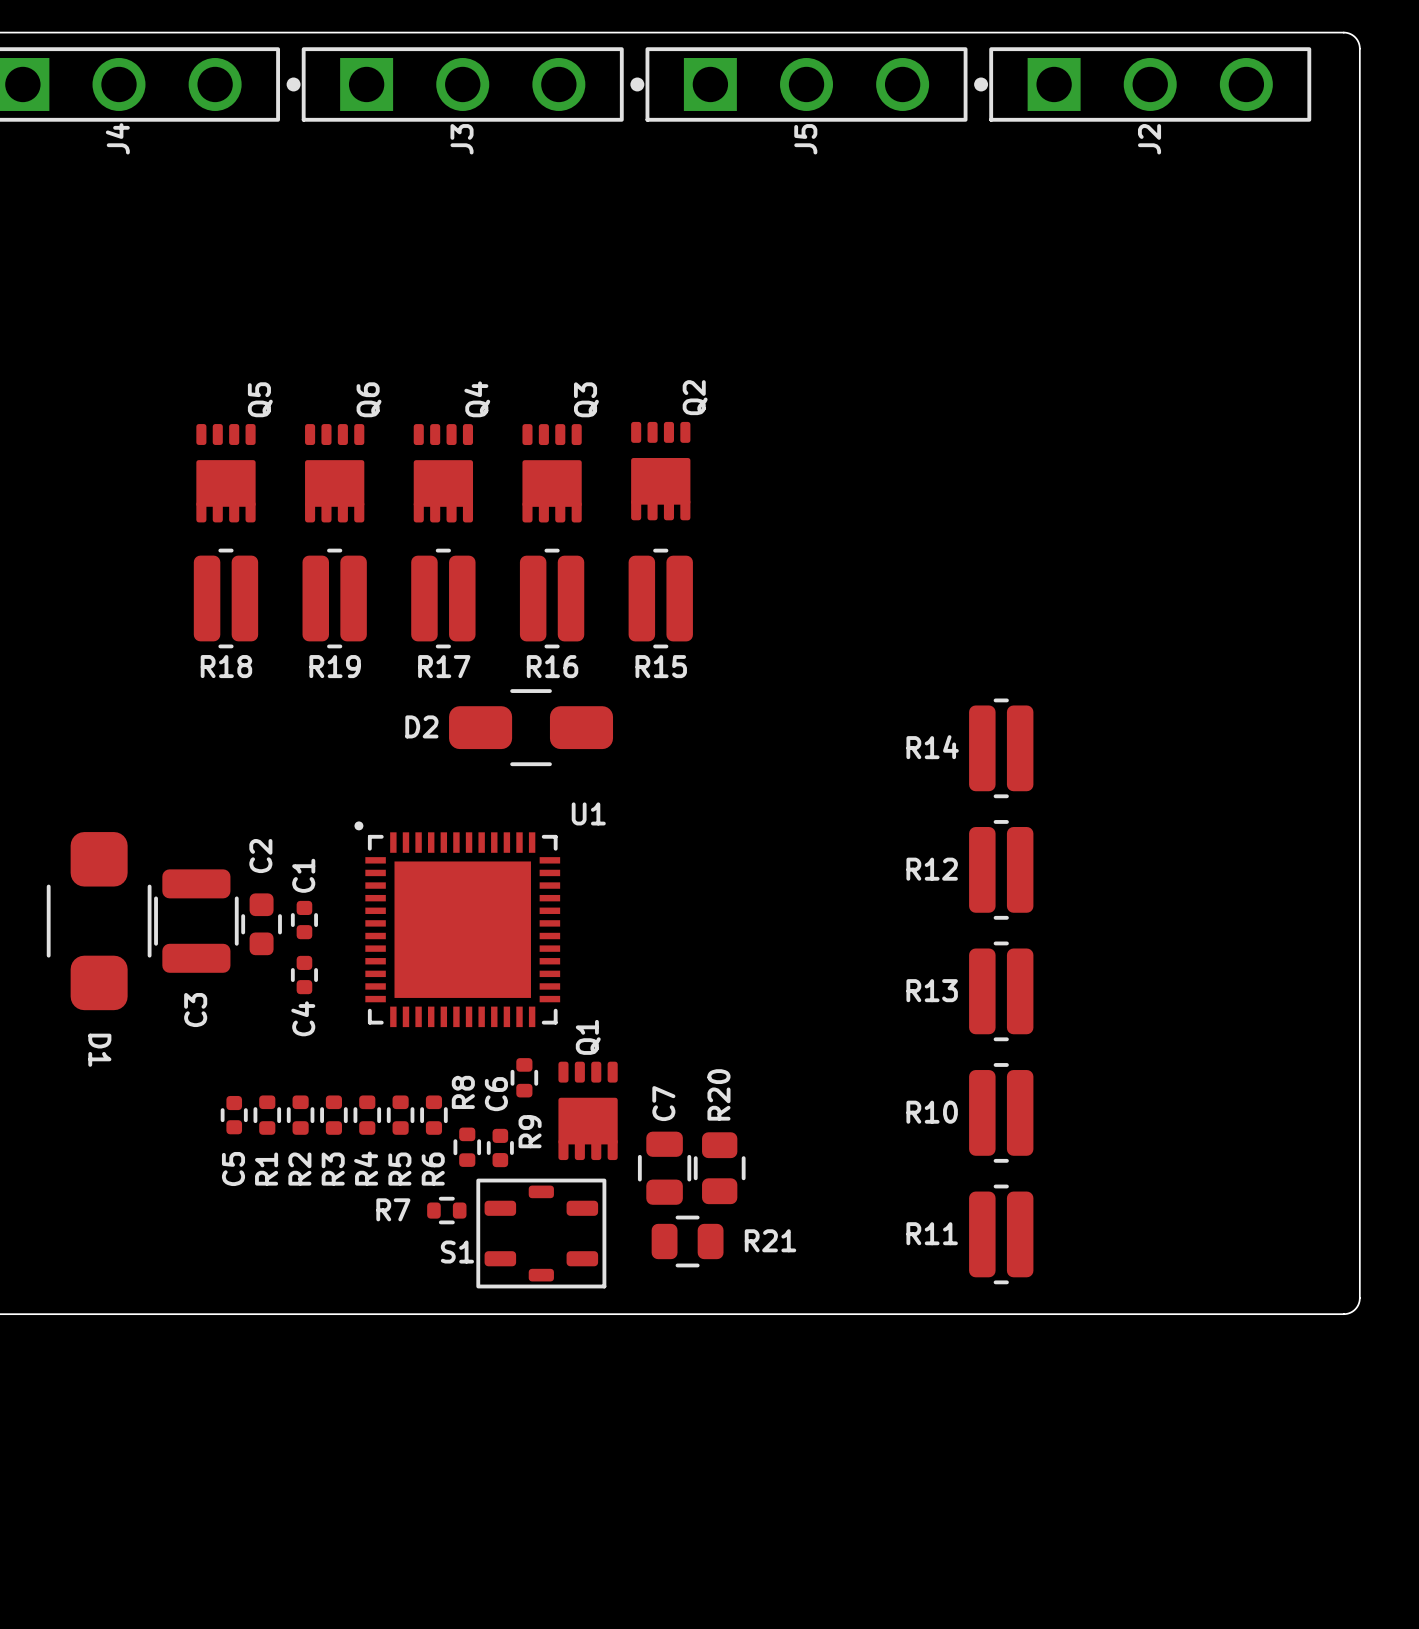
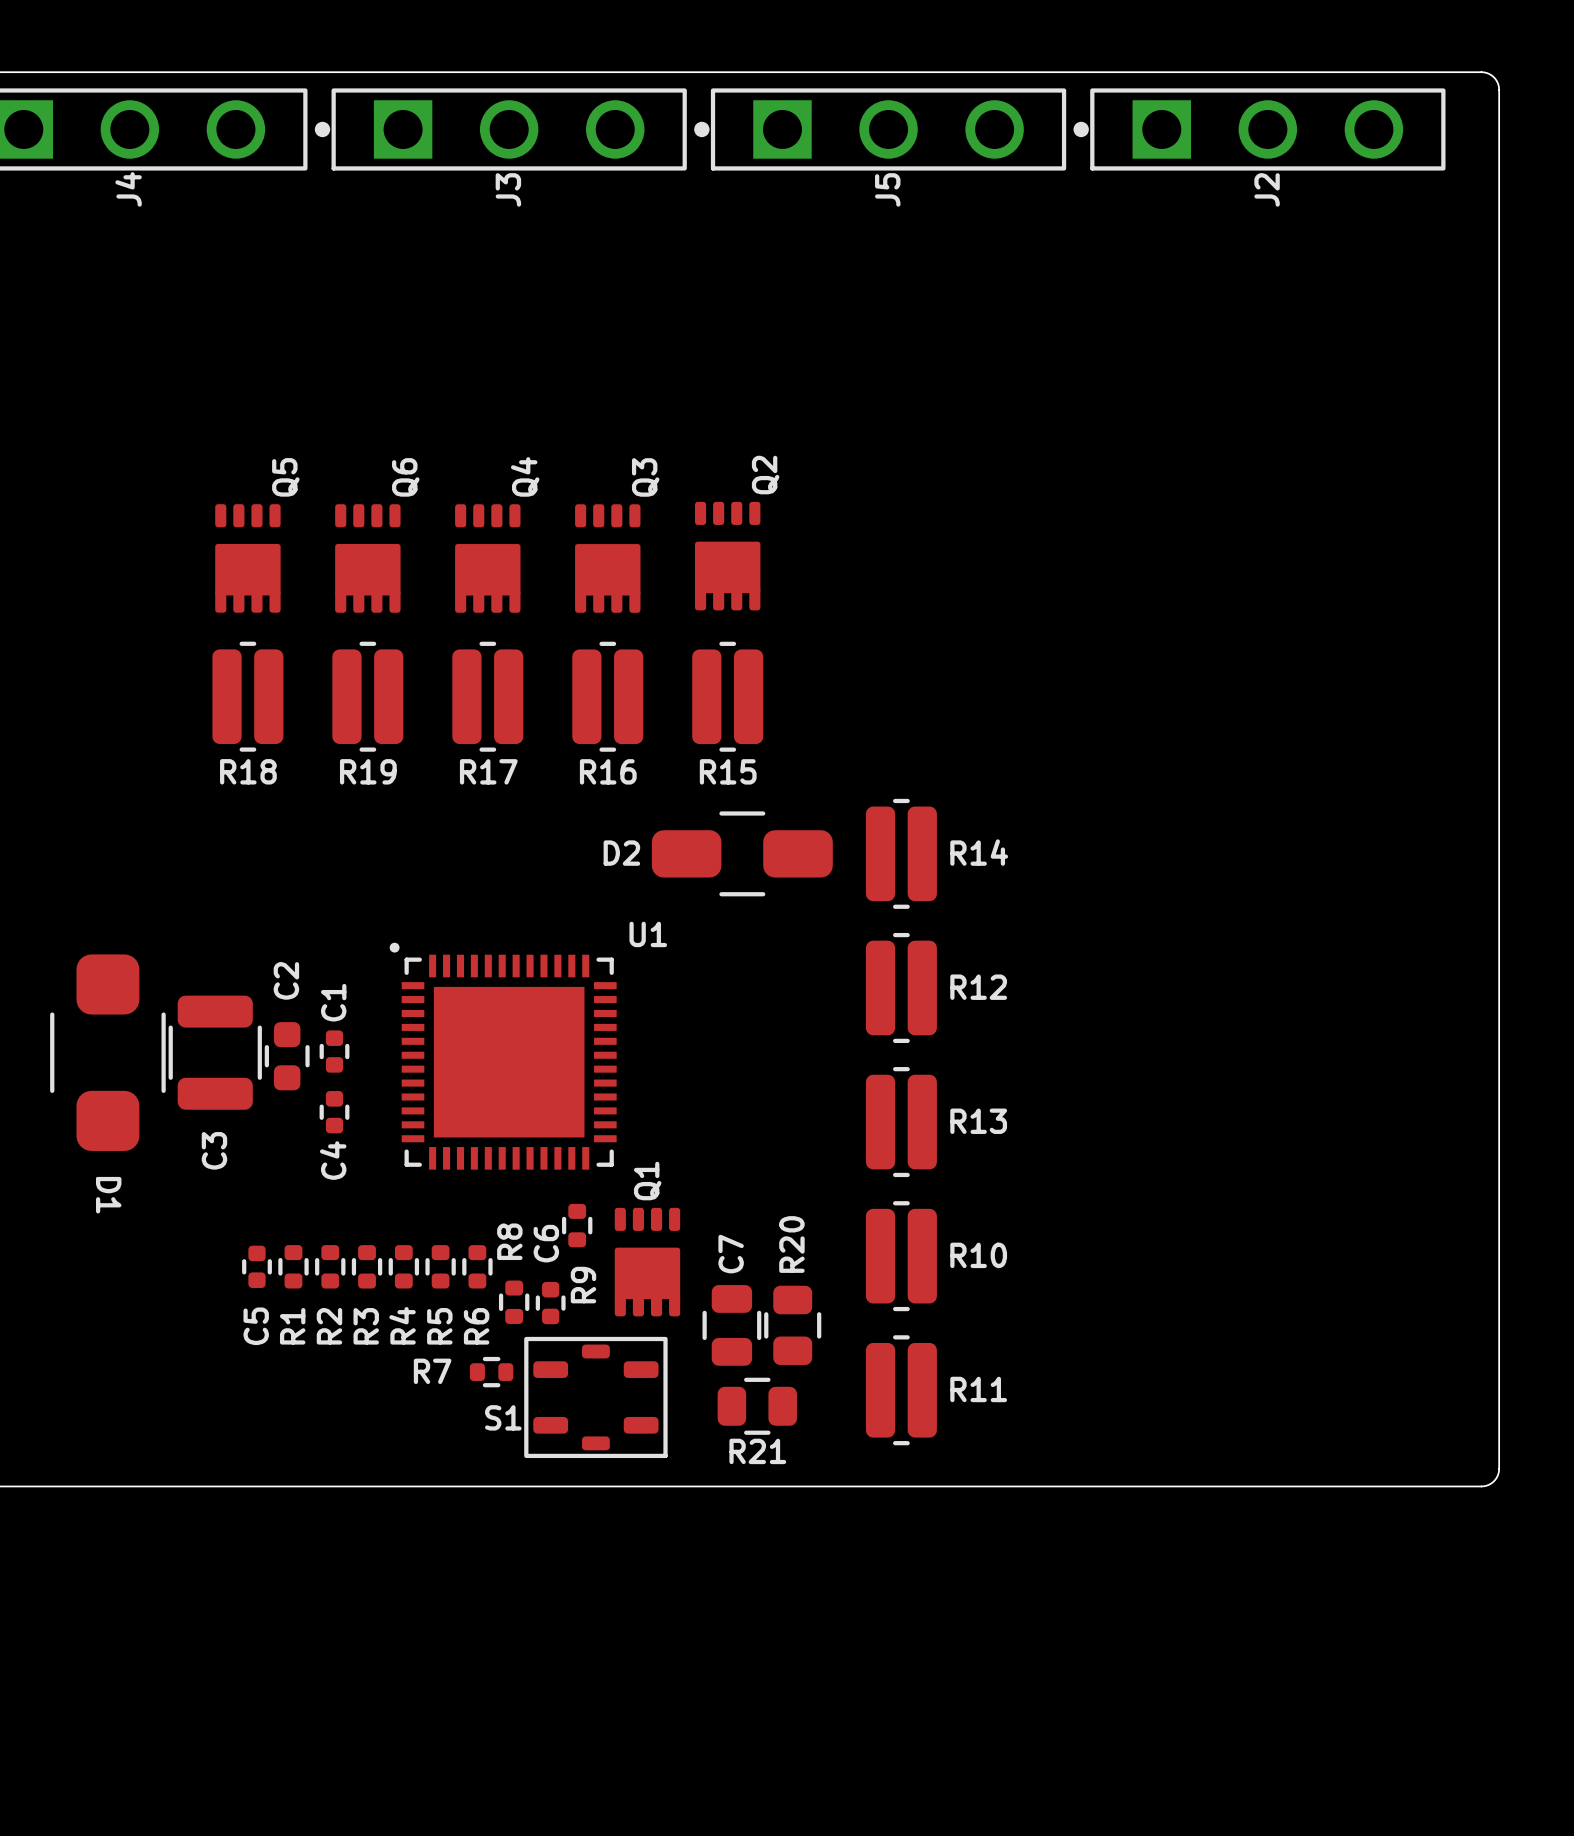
D2 position: (531, 727) -> (742, 853)
R14 name position: R14 (932, 747) -> R14 (979, 852)
R14 position: (1001, 748) -> (901, 853)
R12 name position: R12 (932, 869) -> R12 (978, 987)
R12 position: (1001, 869) -> (901, 987)
R13 name position: R13 (932, 990) -> R13 (978, 1121)
R13 position: (1001, 991) -> (901, 1122)
R10 name position: R10 (932, 1112) -> R10 (978, 1255)
R10 position: (1001, 1112) -> (901, 1256)
R11 name position: R11 (932, 1233) -> R11 (978, 1389)
R11 position: (1001, 1234) -> (901, 1390)
R21 name position: R21 (770, 1240) -> R21 (757, 1451)

